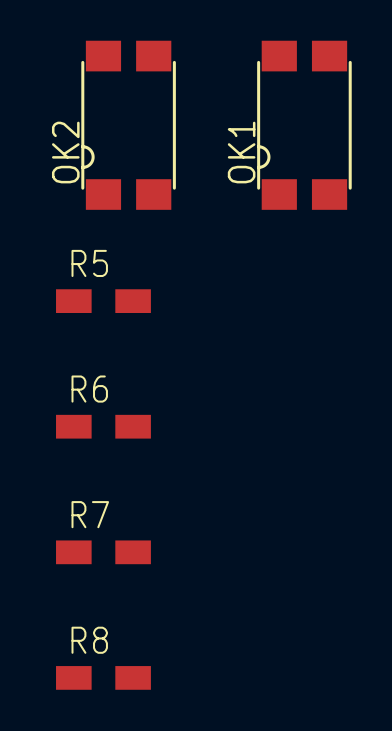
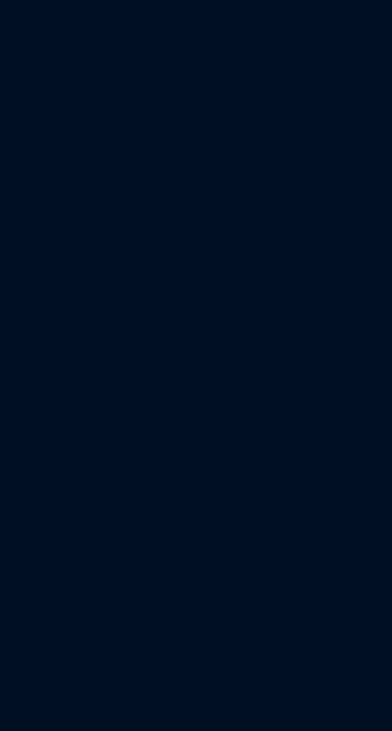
OK2: (128, 125) -> none
OK1: (304, 125) -> none
R5: (103, 301) -> none
R6: (103, 426) -> none
R7: (103, 552) -> none
R8: (103, 677) -> none

